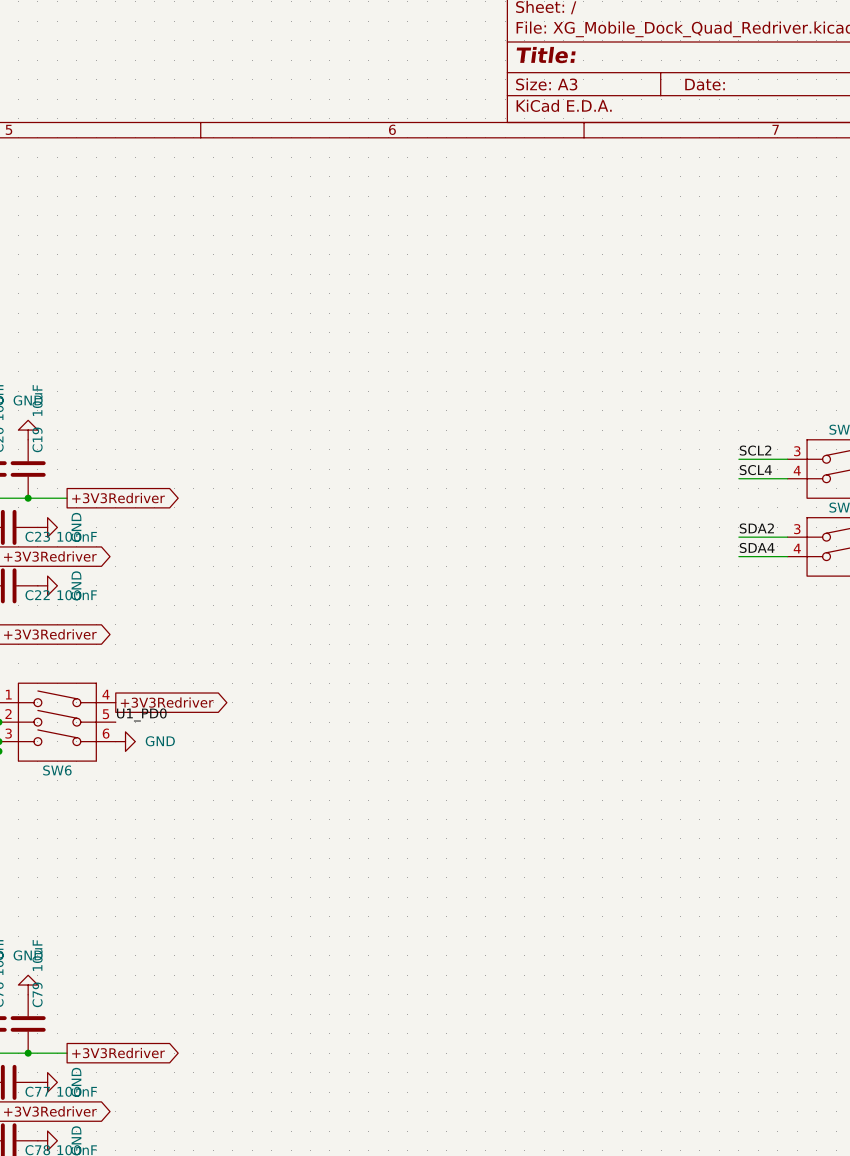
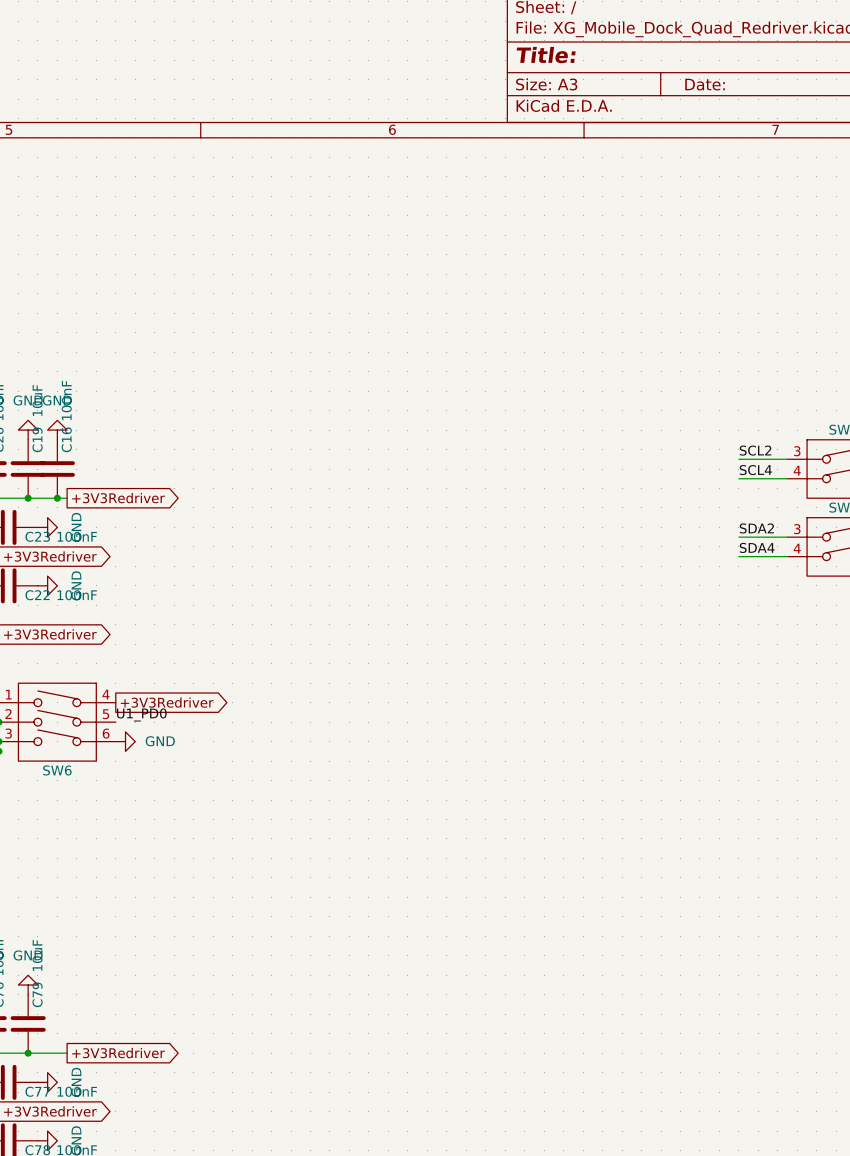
power symbol: none -> GND (57, 430)
C16: none -> 100nF (57, 469)
junction: none -> (57, 498)

